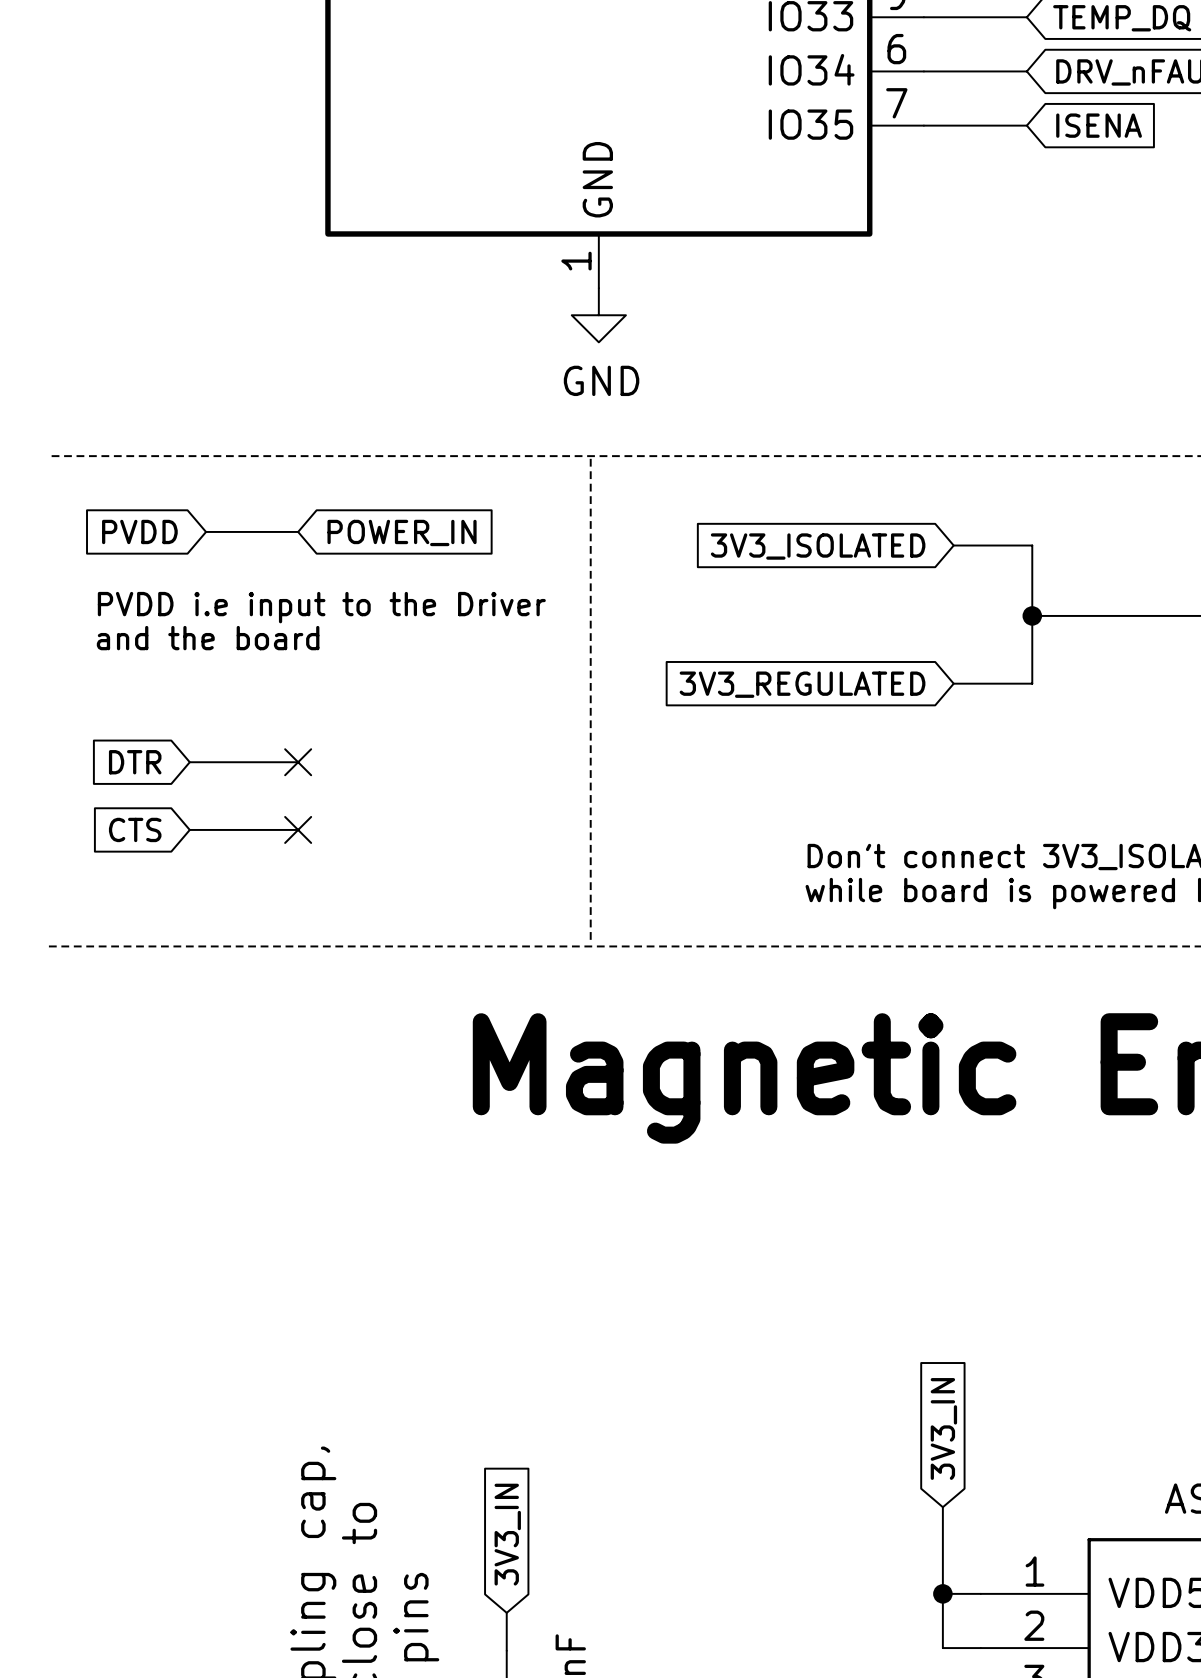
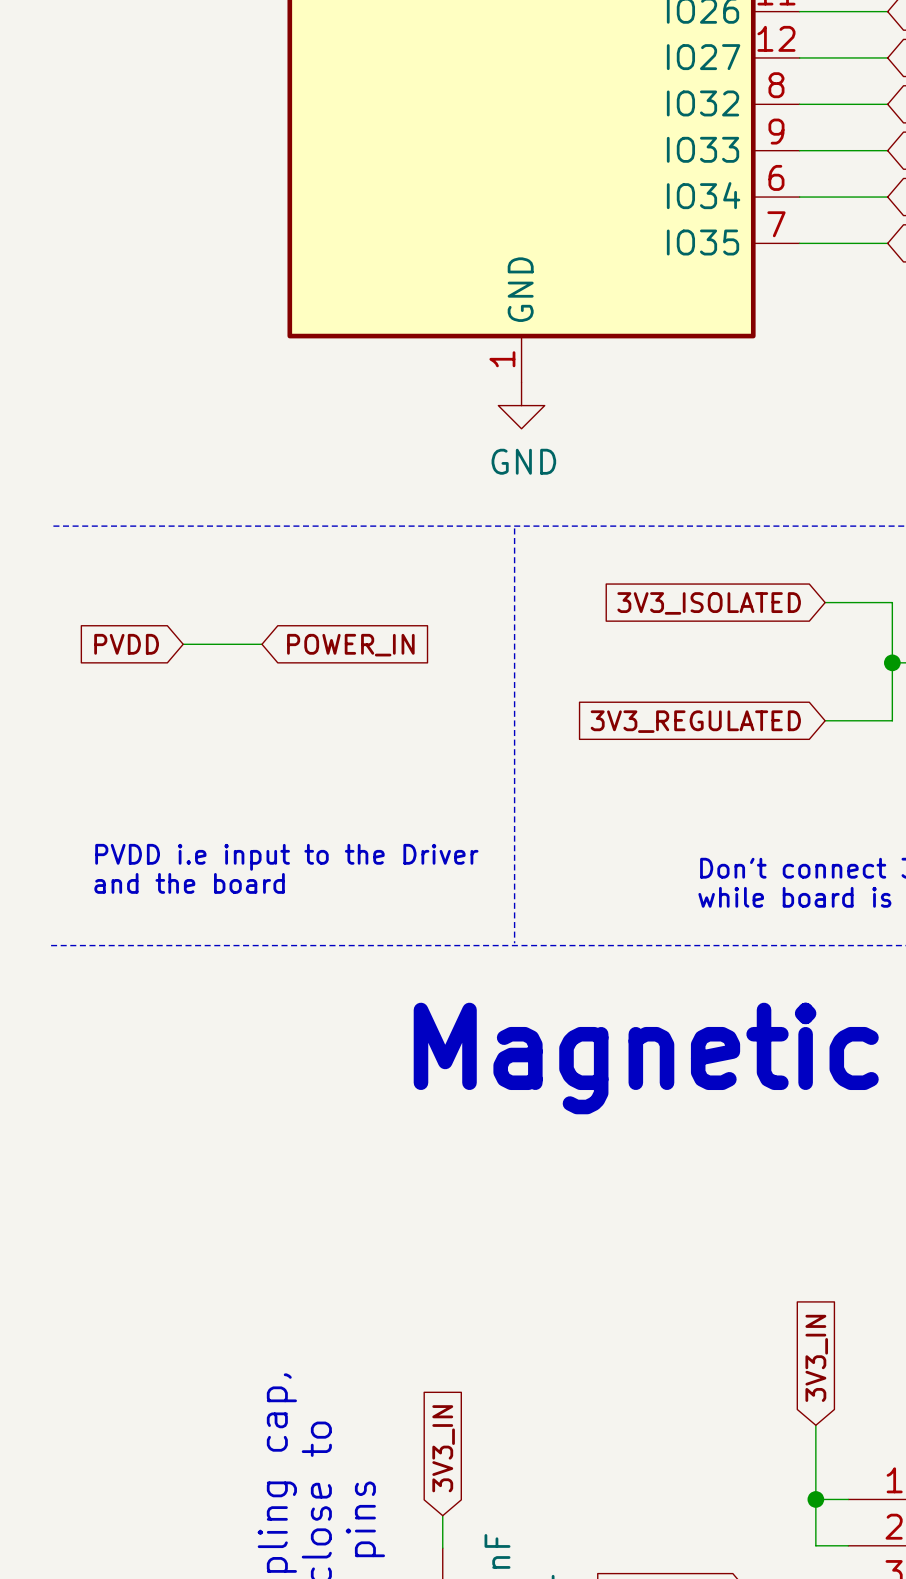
global label position: PVDD (139, 531) -> PVDD (126, 644)
wire: (206, 531) (298, 531) -> (183, 644) (261, 644)
global label position: POWER_IN (402, 532) -> POWER_IN (350, 645)
text position: PVDD i.e input to the Driver (321, 607) -> PVDD i.e input to the Driver (286, 857)
text position: and the board (208, 638) -> and the board (189, 883)
global label: DTR (135, 762) -> none
wire: (189, 762) (298, 762) -> none
no-connect mark: (298, 762) -> none
global label: CTS (135, 829) -> none
wire: (189, 829) (298, 829) -> none
no-connect mark: (298, 829) -> none

